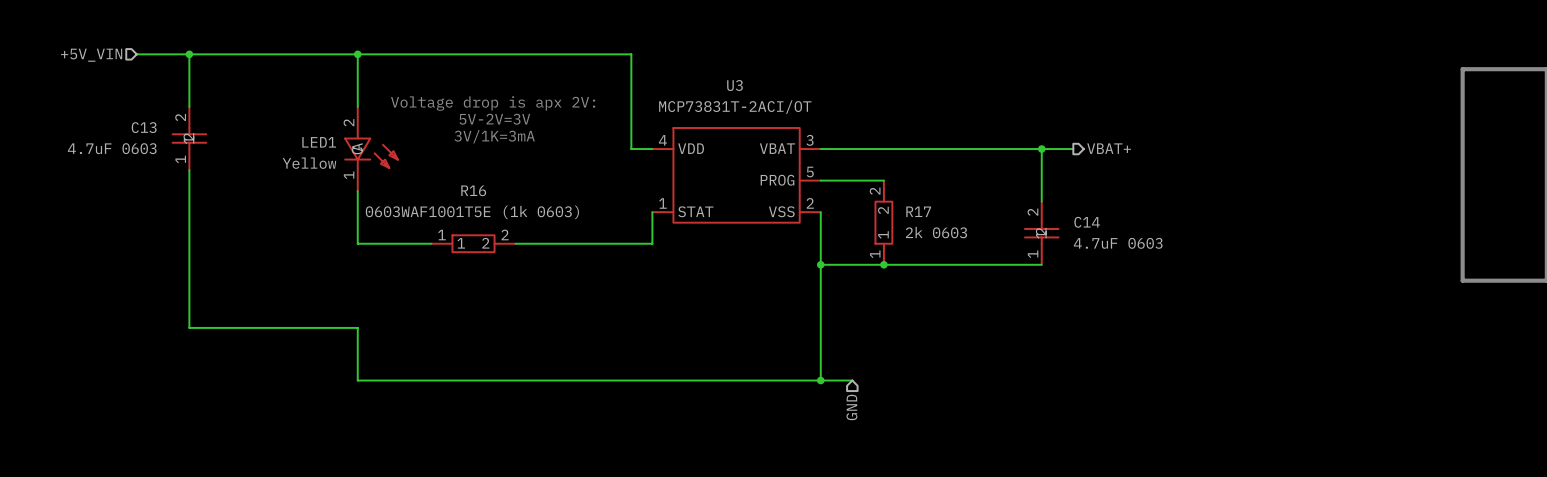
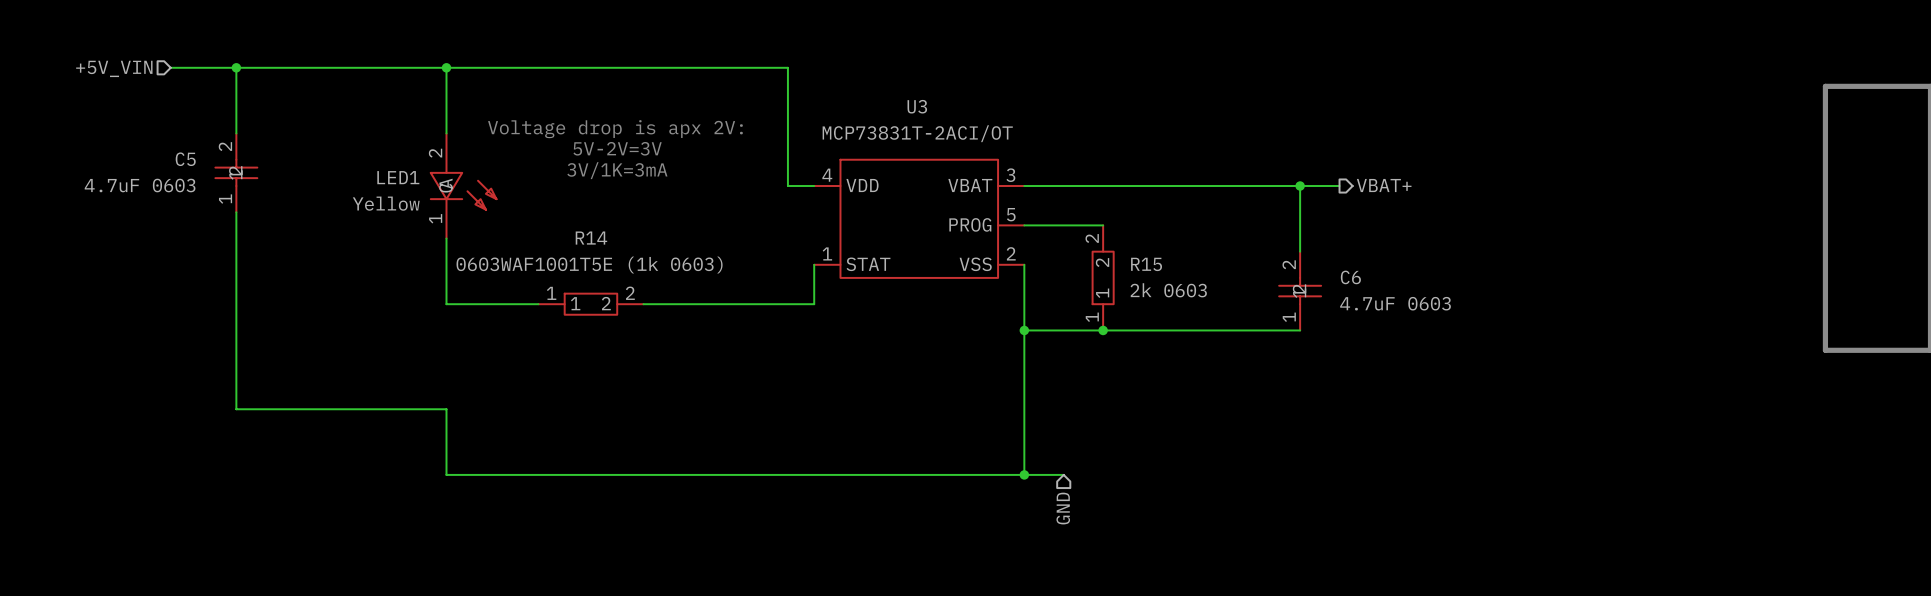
C13 name: C13 (144, 127) -> C5 (185, 159)
R16 name: R16 (473, 190) -> R14 (591, 238)
R17 name: R17 (918, 211) -> R15 (1146, 264)
C14 name: C14 (1087, 222) -> C6 (1350, 277)

